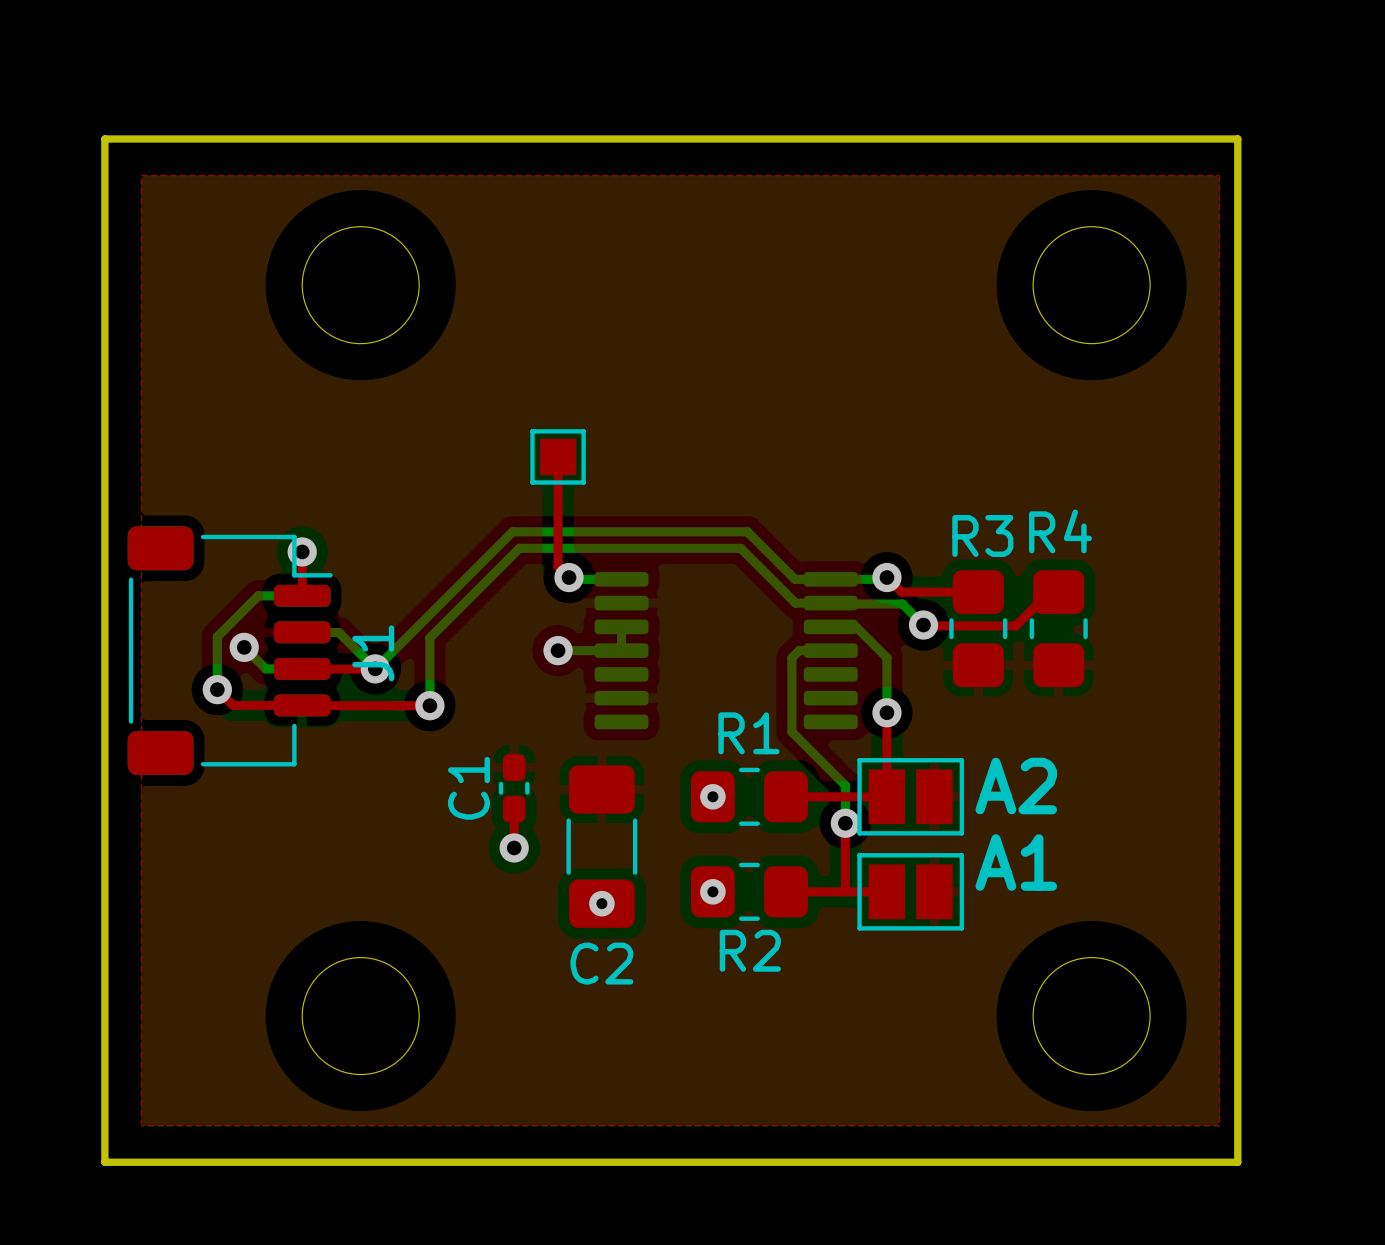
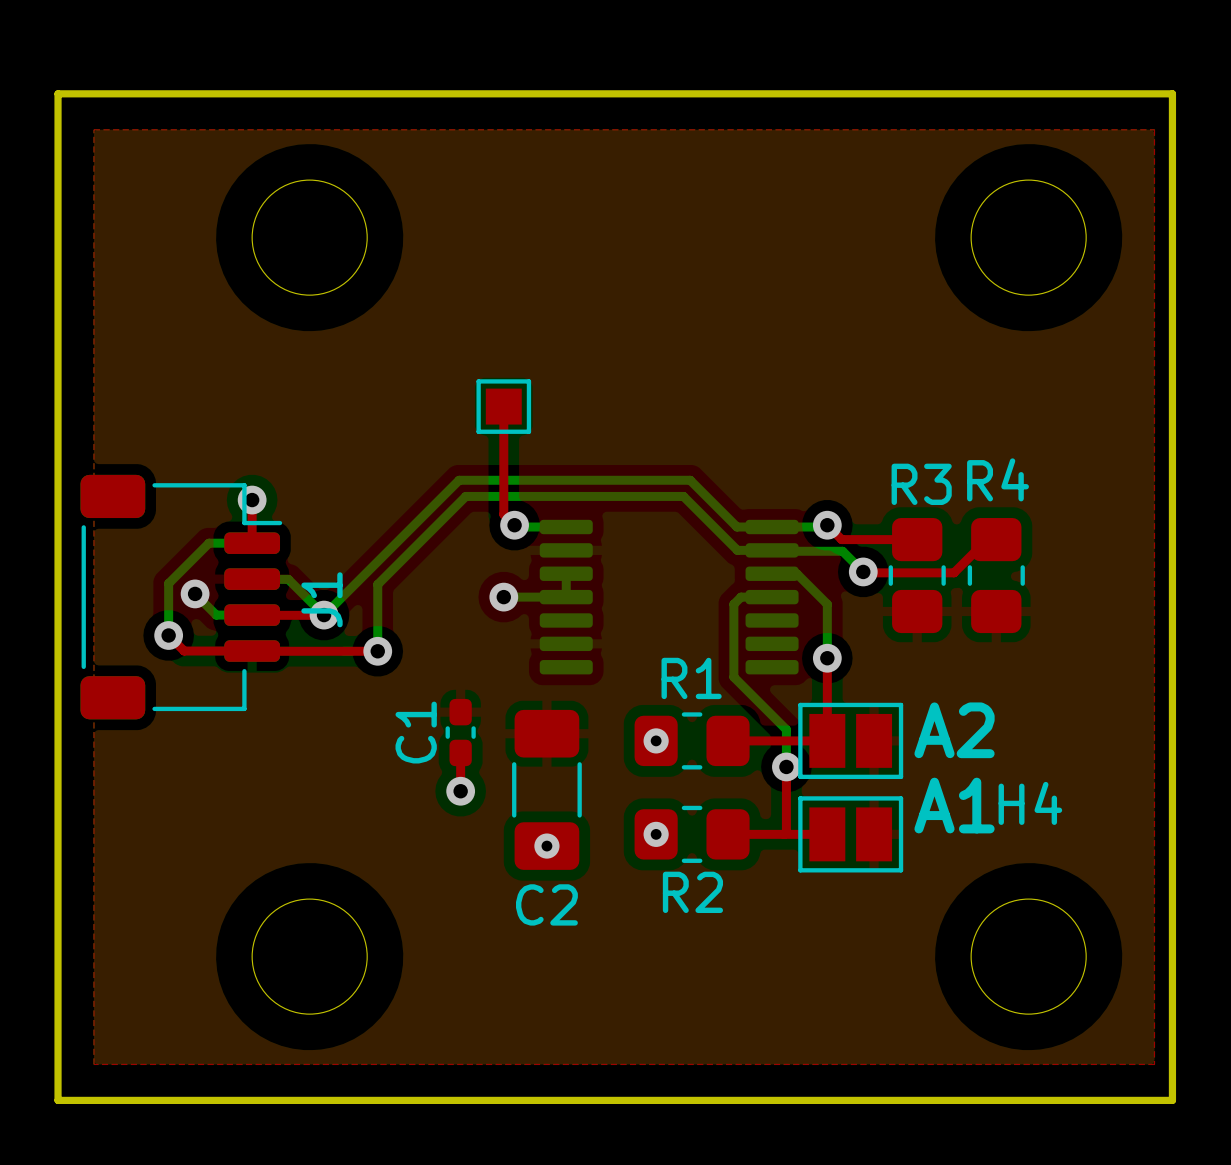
H4 name: none -> H4 (1030, 803)

